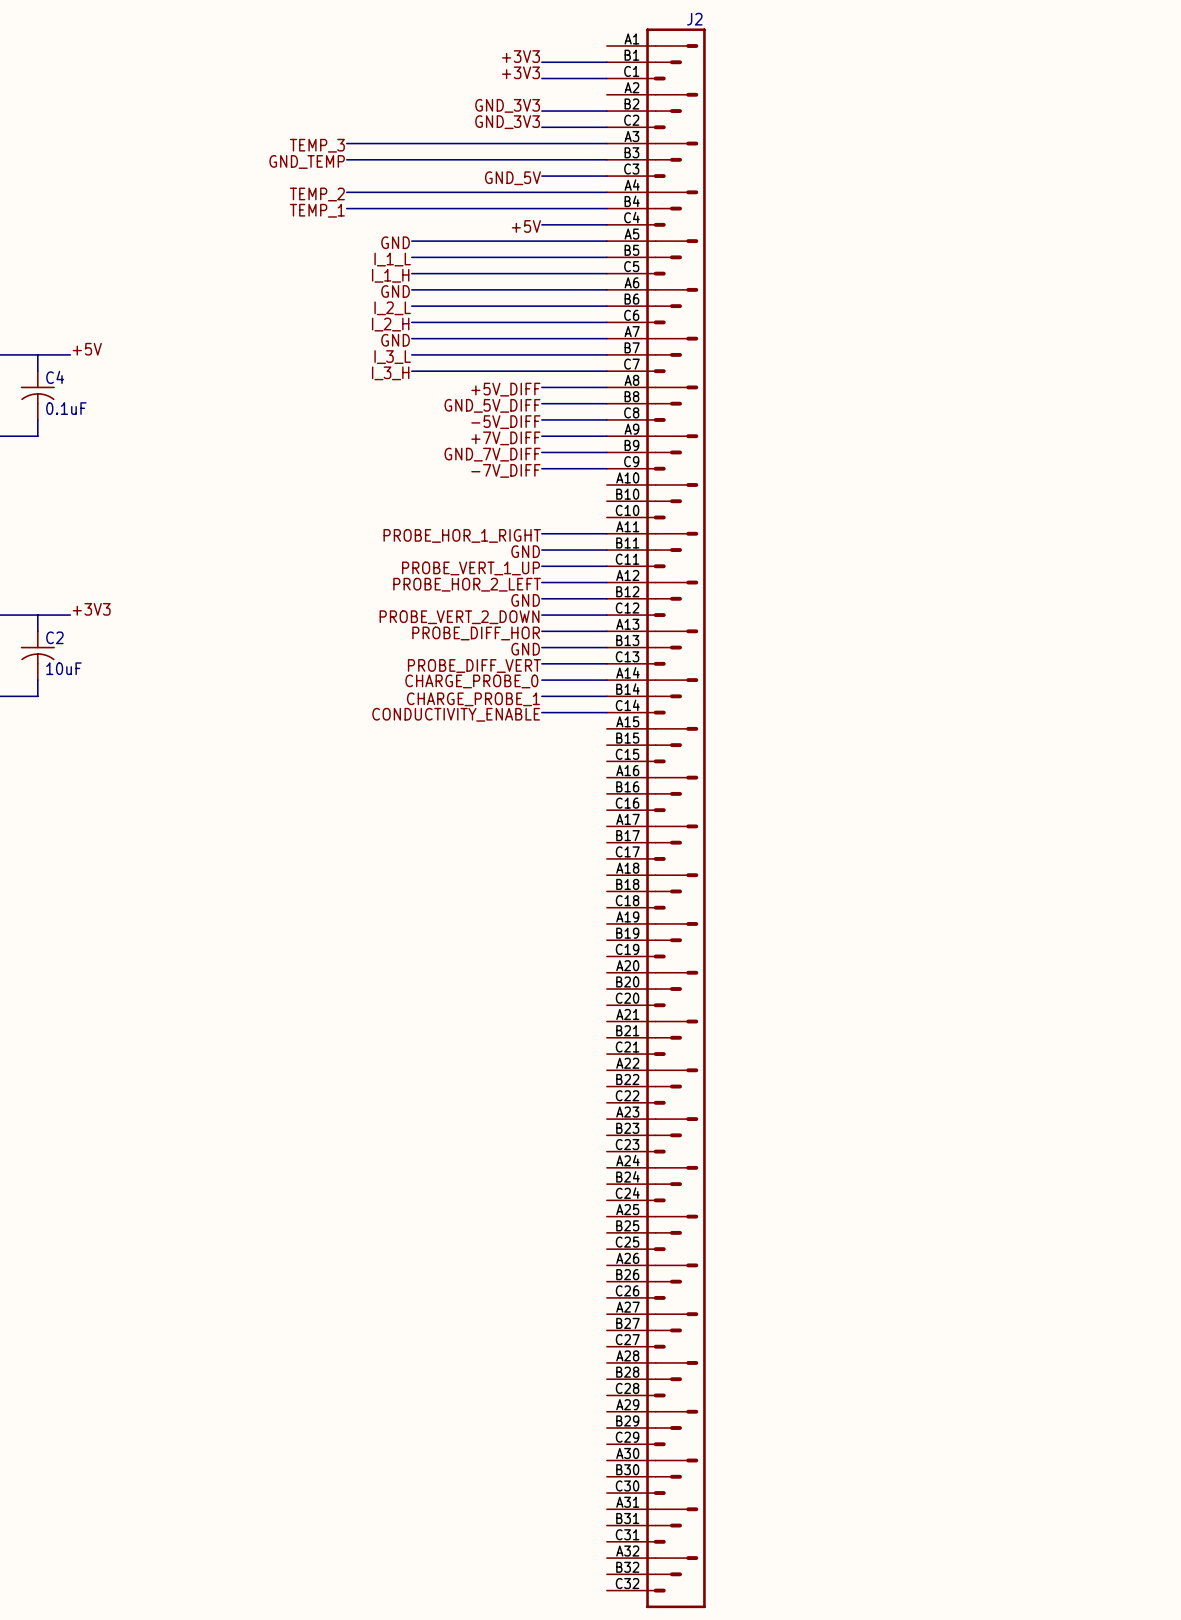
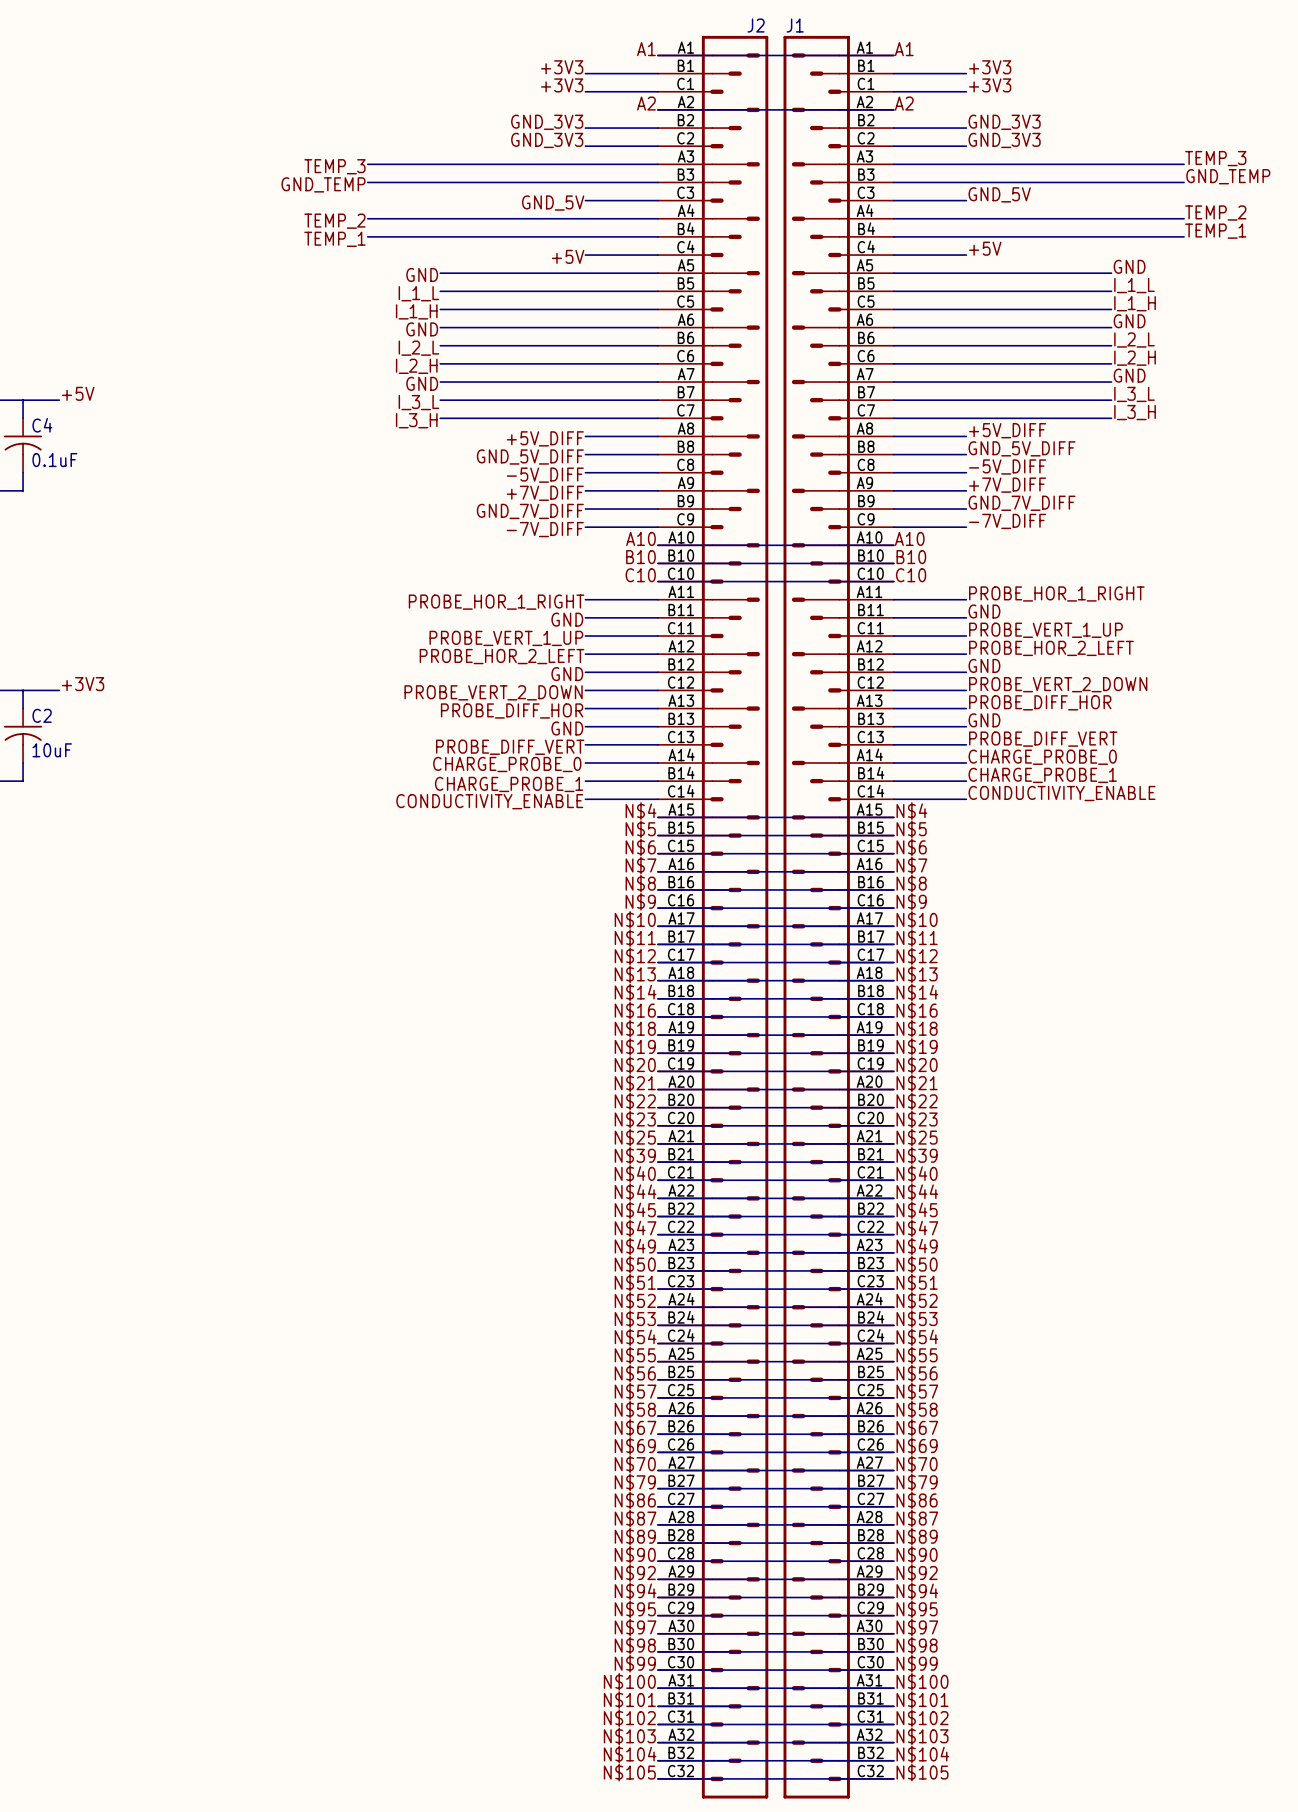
label: none -> A1 (646, 49)
label: none -> A1 (904, 49)
wire: none -> (657, 55) (893, 55)
label: none -> +3V3 (990, 67)
wire: none -> (893, 73) (966, 73)
label: none -> +3V3 (990, 85)
wire: none -> (893, 91) (966, 91)
label: none -> A2 (646, 103)
label: none -> A2 (904, 103)
wire: none -> (657, 109) (893, 109)
label: none -> GND_3V3 (1004, 122)
wire: none -> (893, 128) (966, 128)
label: none -> GND_3V3 (1004, 140)
wire: none -> (893, 146) (966, 146)
label: none -> TEMP_3 (1215, 158)
wire: none -> (893, 164) (1184, 164)
label: none -> GND_TEMP (1228, 176)
wire: none -> (893, 182) (1184, 182)
label: none -> GND_5V (999, 194)
wire: none -> (893, 200) (966, 200)
label: none -> TEMP_2 (1215, 213)
wire: none -> (893, 218) (1184, 218)
label: none -> TEMP_1 (1215, 231)
wire: none -> (893, 236) (1184, 236)
label: none -> +5V (985, 248)
wire: none -> (893, 255) (966, 255)
label: none -> GND (1129, 266)
wire: none -> (893, 273) (1111, 273)
label: none -> I_1_L (1134, 285)
wire: none -> (893, 291) (1111, 291)
label: none -> I_1_H (1135, 303)
wire: none -> (893, 309) (1111, 309)
label: none -> GND (1129, 321)
wire: none -> (893, 327) (1111, 327)
label: none -> I_2_L (1134, 339)
wire: none -> (893, 345) (1111, 345)
label: none -> I_2_H (1135, 358)
wire: none -> (893, 363) (1111, 363)
label: none -> GND (1129, 375)
wire: none -> (893, 382) (1111, 382)
label: none -> I_3_L (1134, 394)
wire: none -> (893, 400) (1111, 400)
label: none -> I_3_H (1135, 412)
wire: none -> (893, 418) (1111, 418)
label: none -> +5V_DIFF (1007, 430)
wire: none -> (893, 436) (966, 436)
label: none -> GND_5V_DIFF (1022, 448)
wire: none -> (893, 454) (966, 454)
label: none -> -5V_DIFF (1007, 466)
wire: none -> (893, 472) (966, 472)
label: none -> +7V_DIFF (1007, 485)
wire: none -> (893, 490) (966, 490)
label: none -> GND_7V_DIFF (1022, 503)
wire: none -> (893, 509) (966, 509)
label: none -> -7V_DIFF (1007, 521)
wire: none -> (893, 527) (966, 527)
label: none -> A10 (640, 538)
label: none -> A10 (909, 538)
wire: none -> (657, 545) (893, 545)
label: none -> B10 (640, 557)
label: none -> B10 (911, 557)
wire: none -> (657, 563) (893, 563)
label: none -> C10 (640, 575)
label: none -> C10 (911, 575)
wire: none -> (657, 581) (893, 581)
label: none -> PROBE_HOR_1_RIGHT (1056, 593)
wire: none -> (893, 599) (966, 599)
label: none -> GND (984, 611)
wire: none -> (893, 617) (966, 617)
label: none -> PROBE_VERT_1_UP (1045, 630)
wire: none -> (893, 636) (966, 636)
label: none -> PROBE_HOR_2_LEFT (1051, 648)
wire: none -> (893, 654) (966, 654)
label: none -> GND (984, 665)
wire: none -> (893, 672) (966, 672)
label: none -> PROBE_VERT_2_DOWN (1058, 684)
wire: none -> (893, 690) (966, 690)
label: none -> PROBE_DIFF_HOR (1040, 702)
wire: none -> (893, 708) (966, 708)
label: none -> GND (984, 720)
wire: none -> (893, 726) (966, 726)
label: none -> PROBE_DIFF_VERT (1043, 739)
wire: none -> (893, 744) (966, 744)
label: none -> CHARGE_PROBE_0 (1042, 757)
wire: none -> (893, 762) (966, 762)
label: none -> CHARGE_PROBE_1 (1042, 775)
wire: none -> (893, 781) (966, 781)
label: none -> CONDUCTIVITY_ENABLE (1062, 793)
wire: none -> (893, 799) (966, 799)
label: none -> N$4 (640, 811)
label: none -> N$4 (911, 811)
wire: none -> (657, 817) (893, 817)
label: none -> N$5 (640, 829)
label: none -> N$5 (911, 829)
wire: none -> (657, 835) (893, 835)
label: none -> N$6 (640, 847)
label: none -> N$6 (911, 847)
wire: none -> (657, 853) (893, 853)
label: none -> N$7 (640, 865)
label: none -> N$7 (911, 865)
wire: none -> (657, 871) (893, 871)
label: none -> N$8 (640, 883)
label: none -> N$8 (911, 883)
wire: none -> (657, 889) (893, 889)
label: none -> N$9 (640, 901)
label: none -> N$9 (911, 901)
wire: none -> (657, 908) (893, 908)
J1: none -> (838, 917)
label: none -> N$10 (635, 919)
label: none -> N$10 (917, 919)
wire: none -> (657, 926) (893, 926)
label: none -> N$11 (635, 938)
label: none -> N$11 (917, 938)
wire: none -> (657, 944) (893, 944)
label: none -> N$12 (635, 956)
label: none -> N$12 (917, 956)
wire: none -> (657, 962) (893, 962)
label: none -> N$13 (635, 974)
label: none -> N$13 (917, 974)
wire: none -> (657, 980) (893, 980)
label: none -> N$14 (635, 992)
label: none -> N$14 (917, 992)
wire: none -> (657, 998) (893, 998)
label: none -> N$16 (635, 1010)
label: none -> N$16 (917, 1010)
wire: none -> (657, 1016) (893, 1016)
label: none -> N$18 (635, 1028)
label: none -> N$18 (917, 1028)
wire: none -> (657, 1035) (893, 1035)
label: none -> N$19 (635, 1046)
label: none -> N$19 (917, 1046)
wire: none -> (657, 1053) (893, 1053)
label: none -> N$20 (635, 1065)
label: none -> N$20 (917, 1065)
wire: none -> (657, 1071) (893, 1071)
label: none -> N$21 (635, 1083)
label: none -> N$21 (917, 1083)
wire: none -> (657, 1089) (893, 1089)
label: none -> N$22 (635, 1101)
label: none -> N$22 (917, 1101)
wire: none -> (657, 1107) (893, 1107)
label: none -> N$23 (635, 1119)
label: none -> N$23 (917, 1119)
wire: none -> (657, 1125) (893, 1125)
label: none -> N$25 (635, 1137)
label: none -> N$25 (917, 1137)
wire: none -> (657, 1143) (893, 1143)
label: none -> N$39 (635, 1155)
label: none -> N$39 (917, 1155)
wire: none -> (657, 1162) (893, 1162)
label: none -> N$40 (635, 1173)
label: none -> N$40 (917, 1173)
wire: none -> (657, 1180) (893, 1180)
label: none -> N$44 (635, 1192)
label: none -> N$44 (917, 1192)
wire: none -> (657, 1198) (893, 1198)
label: none -> N$45 (635, 1210)
label: none -> N$45 (917, 1210)
wire: none -> (657, 1216) (893, 1216)
label: none -> N$47 (635, 1228)
label: none -> N$47 (917, 1228)
wire: none -> (657, 1234) (893, 1234)
label: none -> N$49 (635, 1246)
label: none -> N$49 (917, 1246)
wire: none -> (657, 1252) (893, 1252)
label: none -> N$50 (635, 1264)
label: none -> N$50 (917, 1264)
wire: none -> (657, 1270) (893, 1270)
label: none -> N$51 (635, 1282)
label: none -> N$51 (917, 1282)
wire: none -> (657, 1289) (893, 1289)
label: none -> N$52 (635, 1300)
label: none -> N$52 (917, 1300)
wire: none -> (657, 1307) (893, 1307)
label: none -> N$53 (635, 1319)
label: none -> N$53 (917, 1319)
wire: none -> (657, 1325) (893, 1325)
label: none -> N$54 (635, 1337)
label: none -> N$54 (917, 1337)
wire: none -> (657, 1343) (893, 1343)
label: none -> N$55 (635, 1355)
label: none -> N$55 (917, 1355)
wire: none -> (657, 1361) (893, 1361)
label: none -> N$56 (635, 1373)
label: none -> N$56 (917, 1373)
wire: none -> (657, 1379) (893, 1379)
label: none -> N$57 (635, 1391)
label: none -> N$57 (917, 1391)
wire: none -> (657, 1397) (893, 1397)
label: none -> N$58 (635, 1409)
label: none -> N$58 (917, 1409)
wire: none -> (657, 1416) (893, 1416)
label: none -> N$67 (635, 1427)
label: none -> N$67 (917, 1427)
wire: none -> (657, 1434) (893, 1434)
label: none -> N$69 (635, 1446)
label: none -> N$69 (917, 1446)
wire: none -> (657, 1452) (893, 1452)
label: none -> N$70 (635, 1464)
label: none -> N$70 (917, 1464)
wire: none -> (657, 1470) (893, 1470)
label: none -> N$79 (635, 1482)
label: none -> N$79 (917, 1482)
wire: none -> (657, 1488) (893, 1488)
label: none -> N$86 (635, 1500)
label: none -> N$86 (917, 1500)
wire: none -> (657, 1506) (893, 1506)
label: none -> N$87 (635, 1518)
label: none -> N$87 (917, 1518)
wire: none -> (657, 1524) (893, 1524)
label: none -> N$89 (635, 1536)
label: none -> N$89 (917, 1536)
wire: none -> (657, 1543) (893, 1543)
label: none -> N$90 (635, 1554)
label: none -> N$90 (917, 1554)
wire: none -> (657, 1561) (893, 1561)
label: none -> N$92 (635, 1573)
label: none -> N$92 (917, 1573)
wire: none -> (657, 1579) (893, 1579)
label: none -> N$94 (635, 1591)
label: none -> N$94 (917, 1591)
wire: none -> (657, 1597) (893, 1597)
label: none -> N$95 (635, 1609)
label: none -> N$95 (917, 1609)
wire: none -> (657, 1615) (893, 1615)
label: none -> N$97 (635, 1627)
label: none -> N$97 (917, 1627)
wire: none -> (657, 1633) (893, 1633)
label: none -> N$98 (635, 1645)
label: none -> N$98 (917, 1645)
wire: none -> (657, 1651) (893, 1651)
label: none -> N$99 (635, 1663)
label: none -> N$99 (917, 1663)
wire: none -> (657, 1670) (893, 1670)
label: none -> N$100 (629, 1681)
label: none -> N$100 (922, 1681)
wire: none -> (657, 1688) (893, 1688)
label: none -> N$101 (629, 1700)
label: none -> N$101 (922, 1700)
wire: none -> (657, 1706) (893, 1706)
label: none -> N$102 (629, 1718)
label: none -> N$102 (922, 1718)
wire: none -> (657, 1724) (893, 1724)
label: none -> N$103 (629, 1736)
label: none -> N$103 (922, 1736)
wire: none -> (657, 1742) (893, 1742)
label: none -> N$104 (630, 1754)
label: none -> N$104 (922, 1754)
wire: none -> (657, 1760) (893, 1760)
label: none -> N$105 (629, 1772)
label: none -> N$105 (922, 1772)
wire: none -> (657, 1778) (893, 1778)

